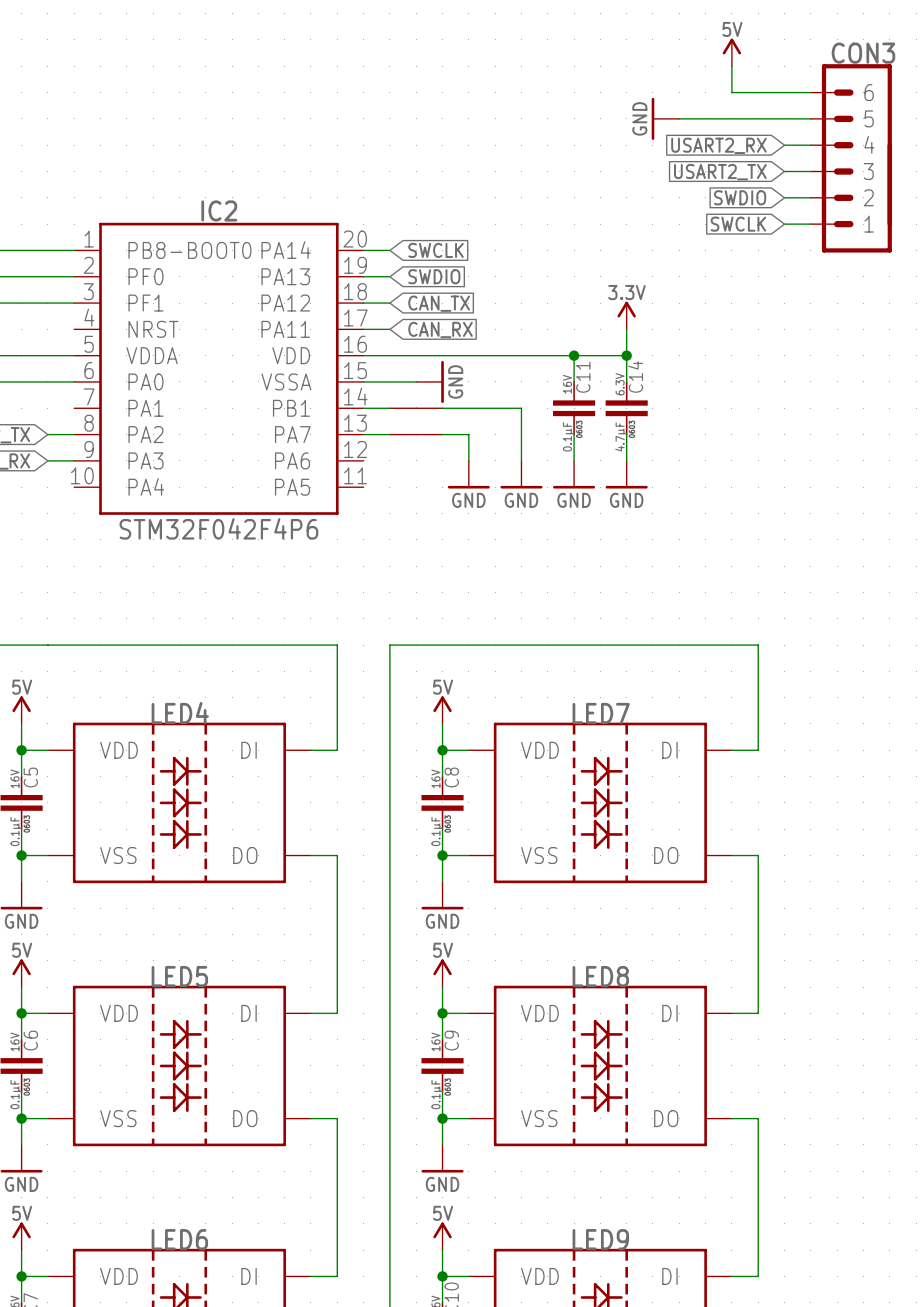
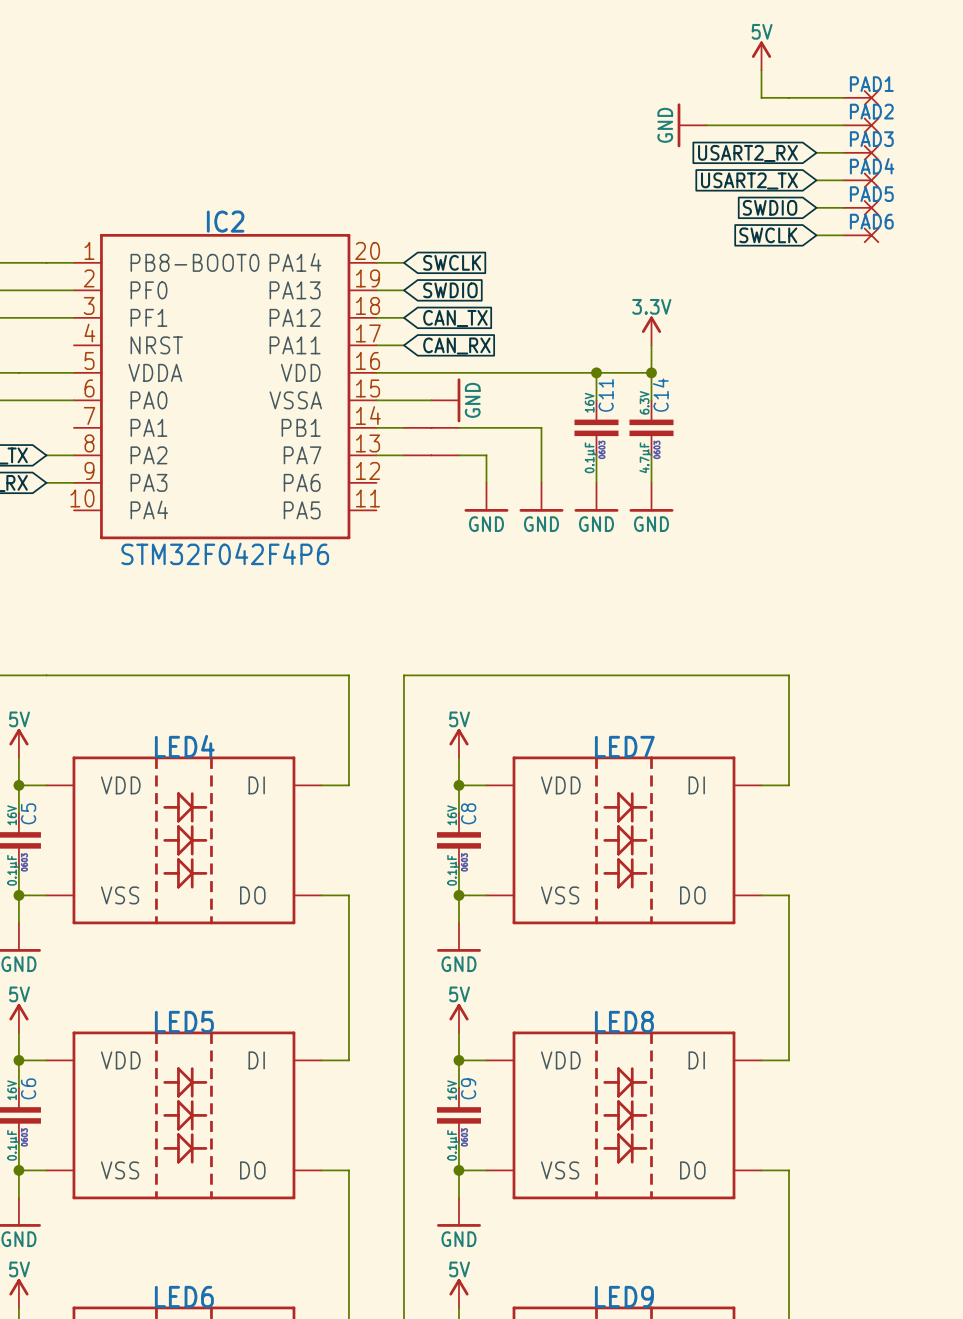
PAD1: none -> (861, 97)
PAD2: none -> (861, 125)
PAD3: none -> (861, 152)
CON3: (851, 158) -> none
PAD4: none -> (861, 180)
PAD5: none -> (861, 207)
PAD6: none -> (861, 235)

